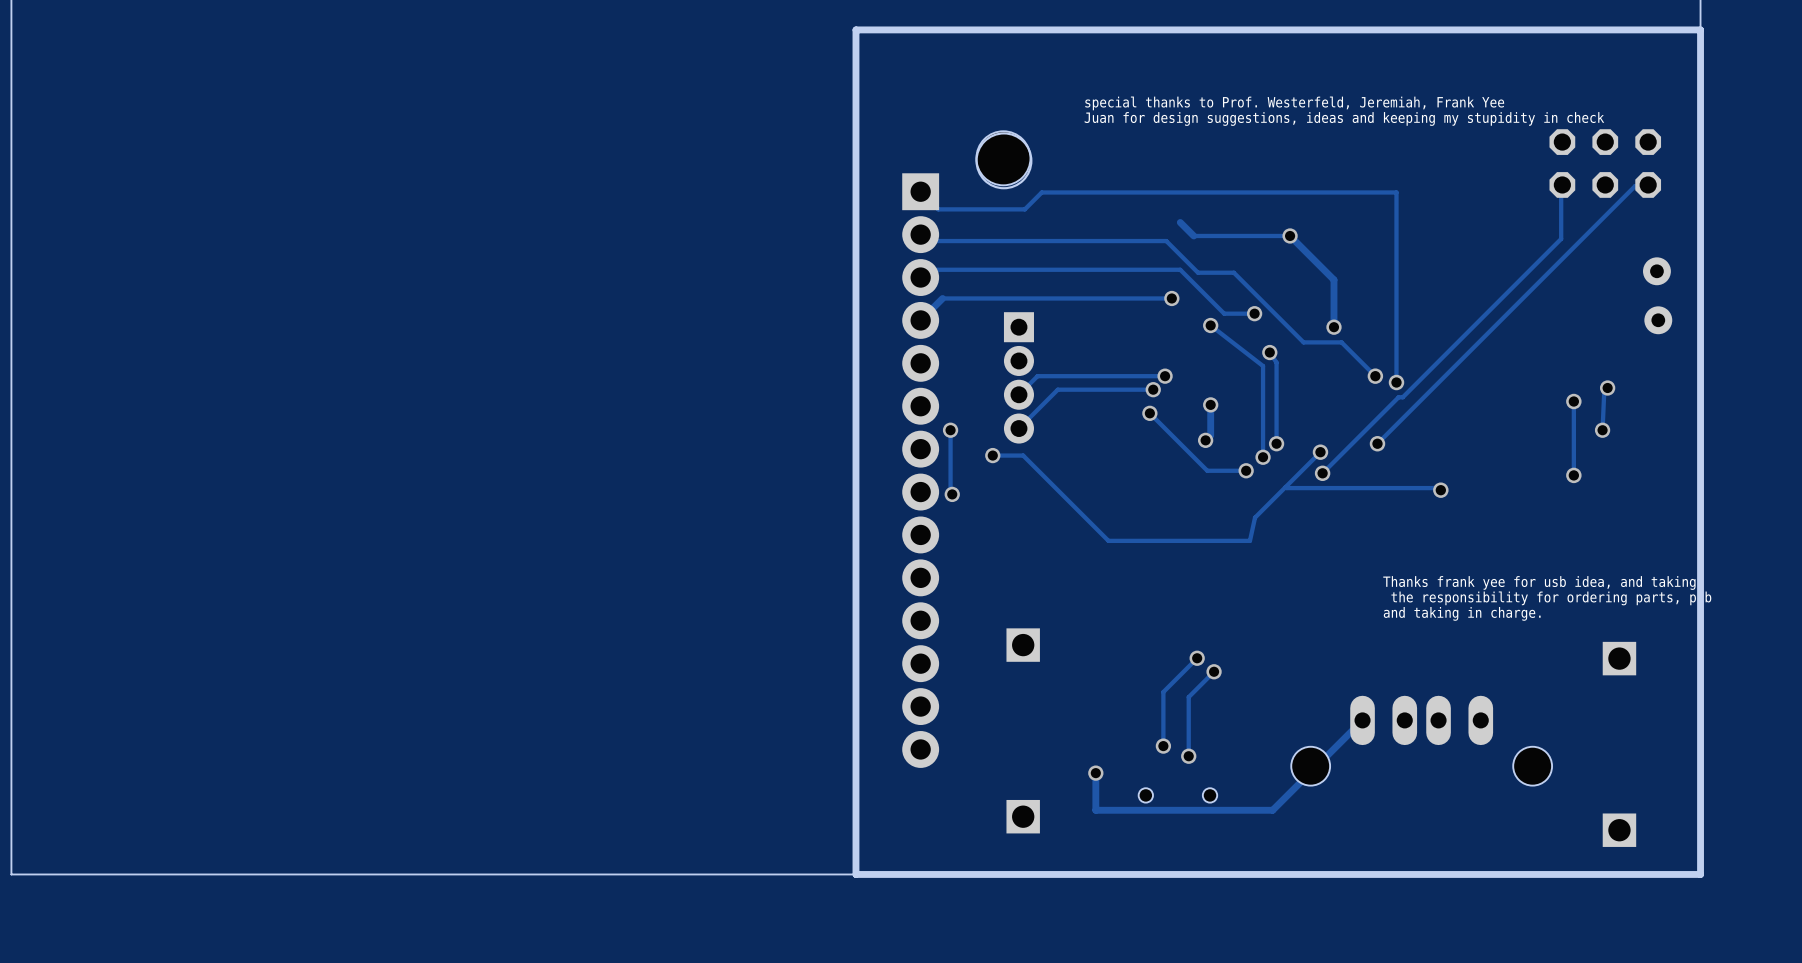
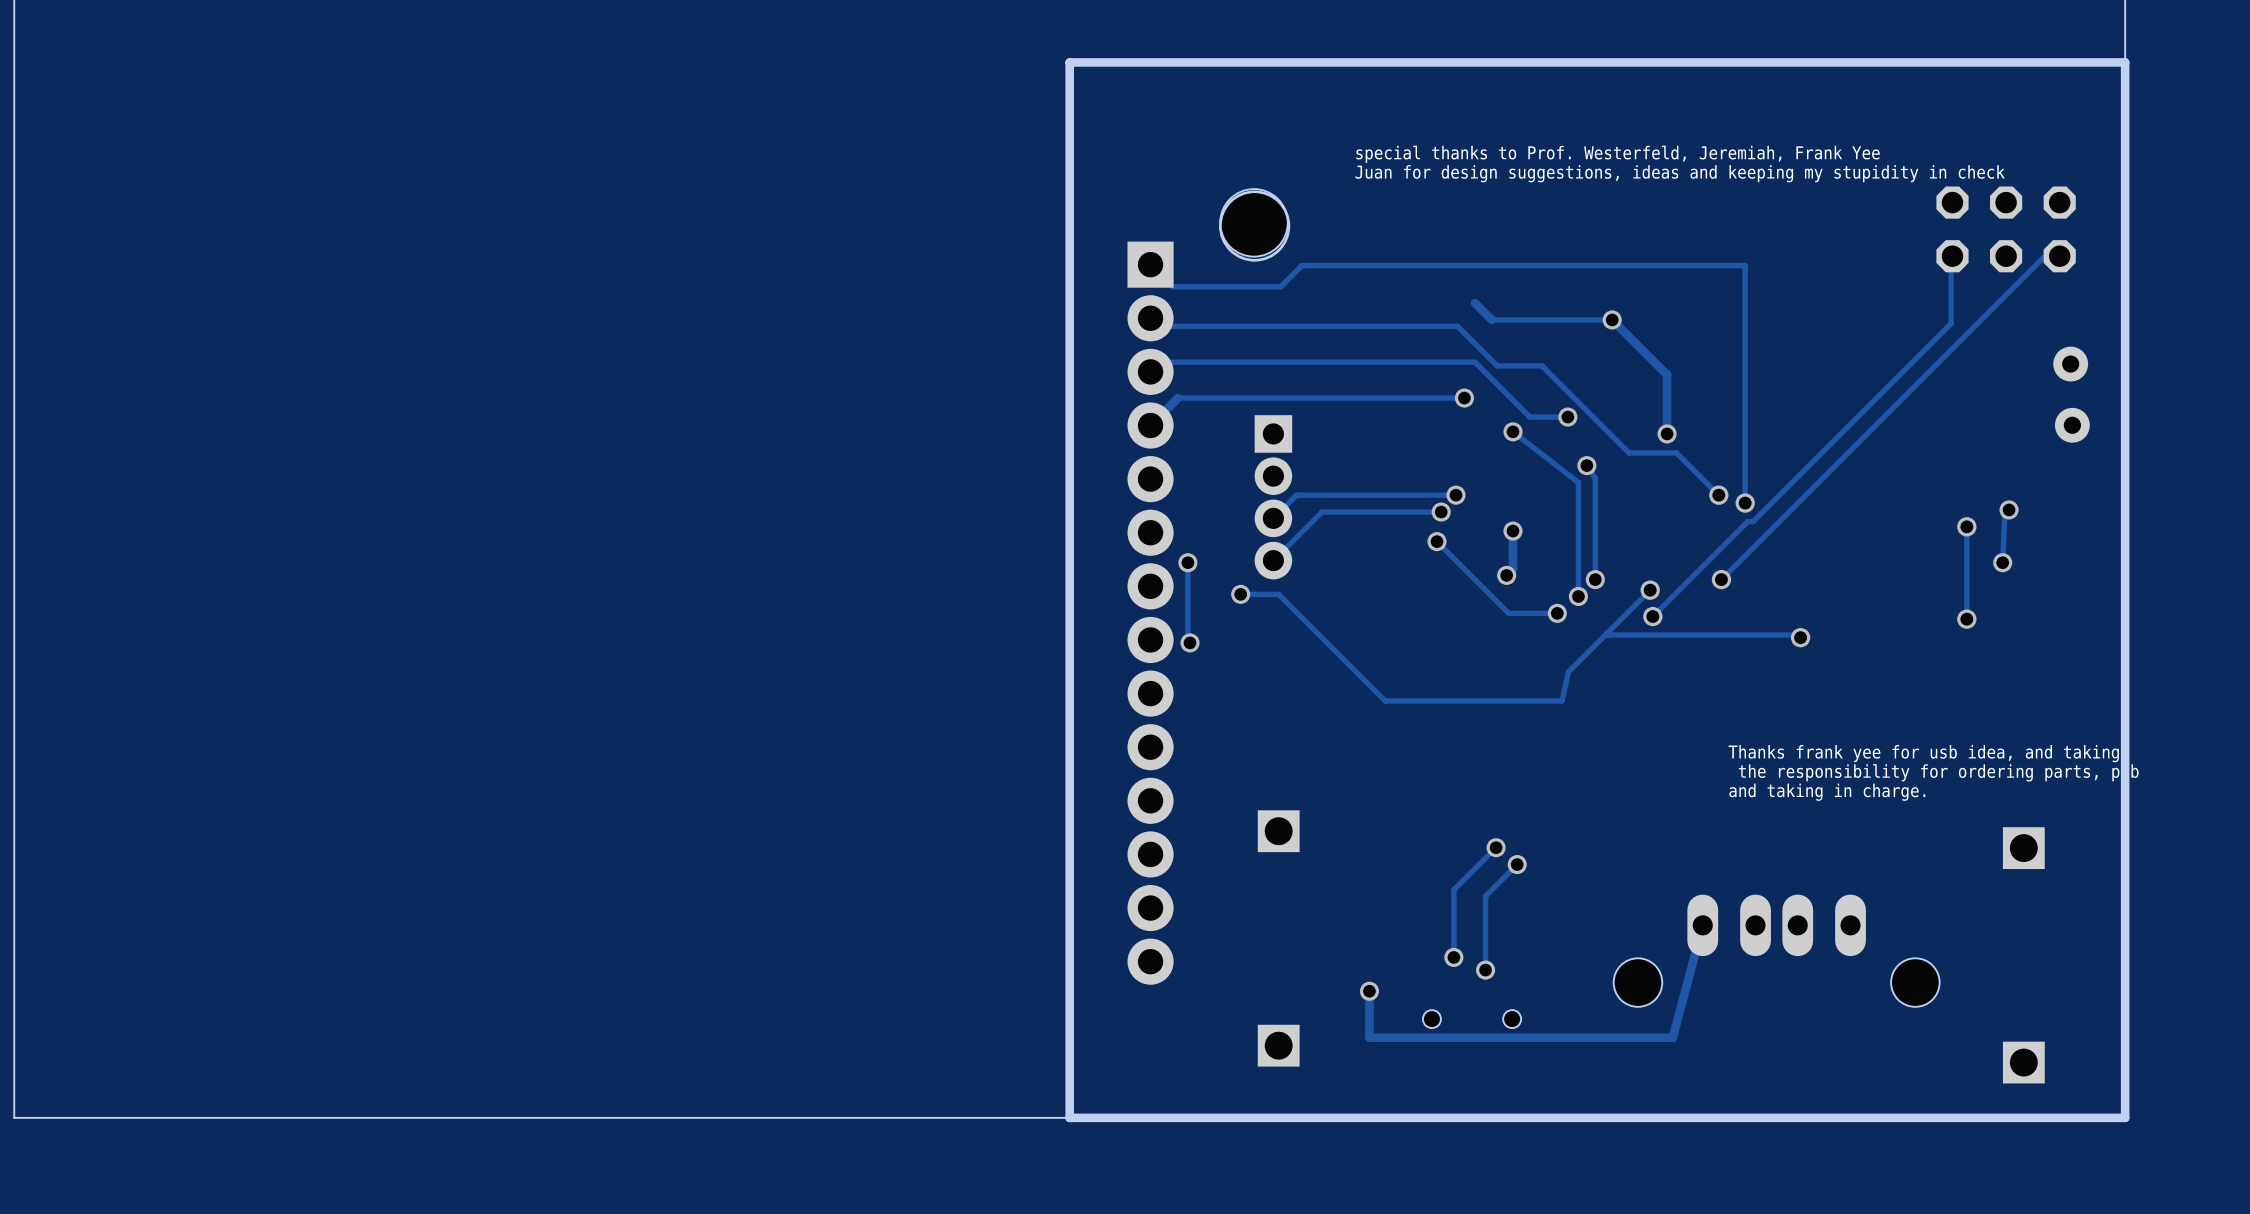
track: (1362, 720) (1272, 810) -> (1702, 925) (1672, 1037) (1590, 1037)

